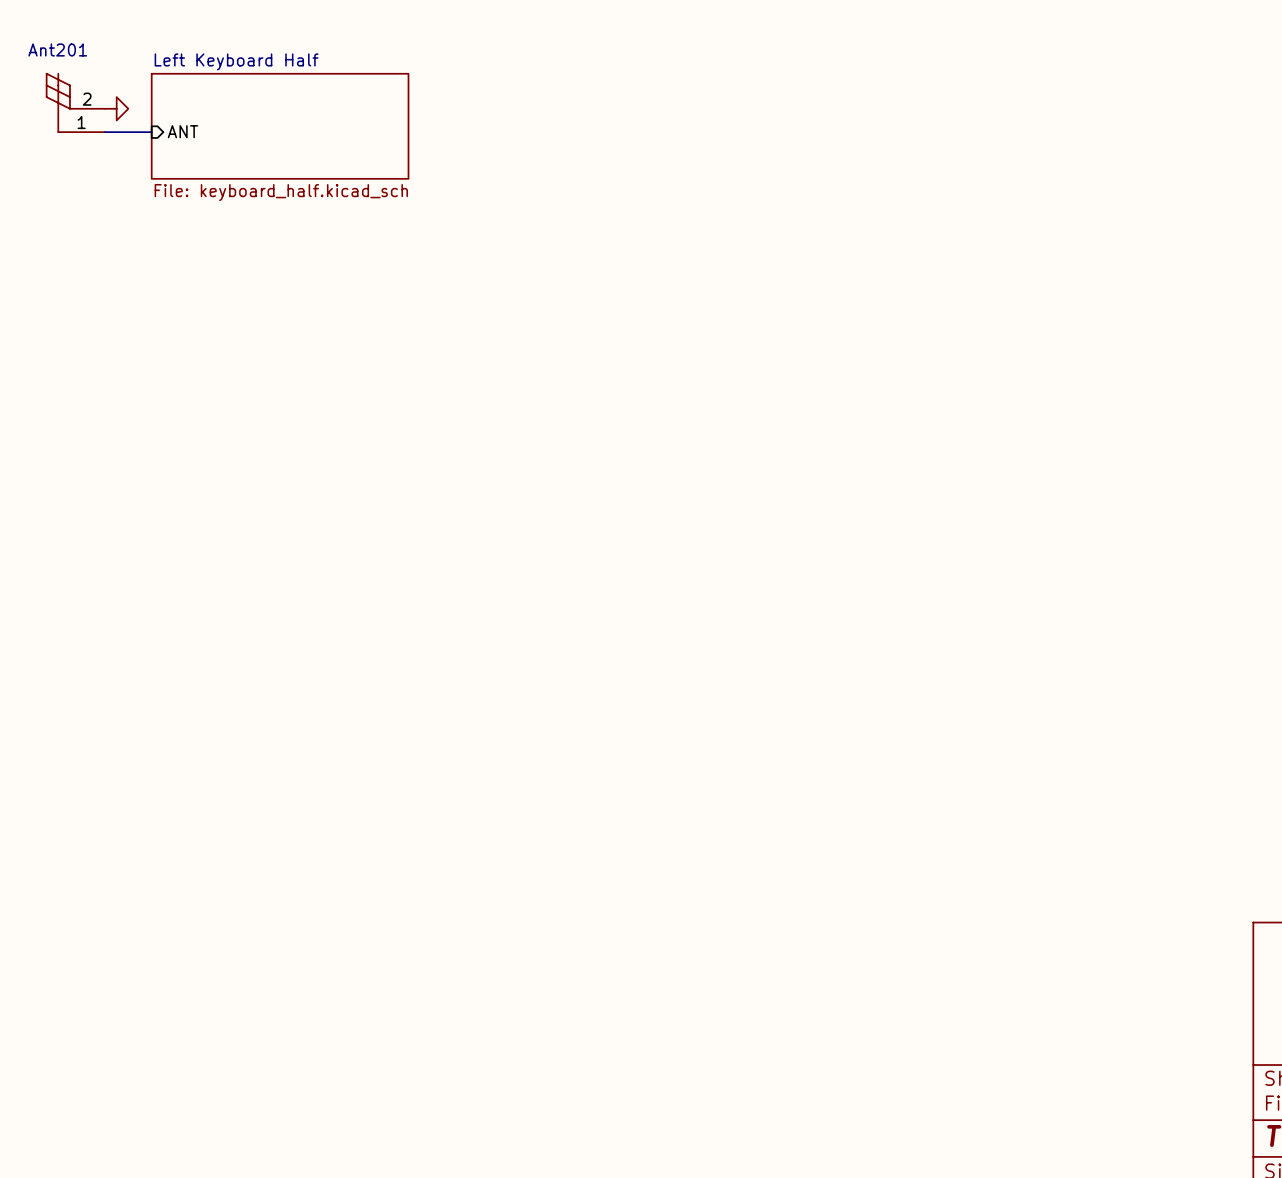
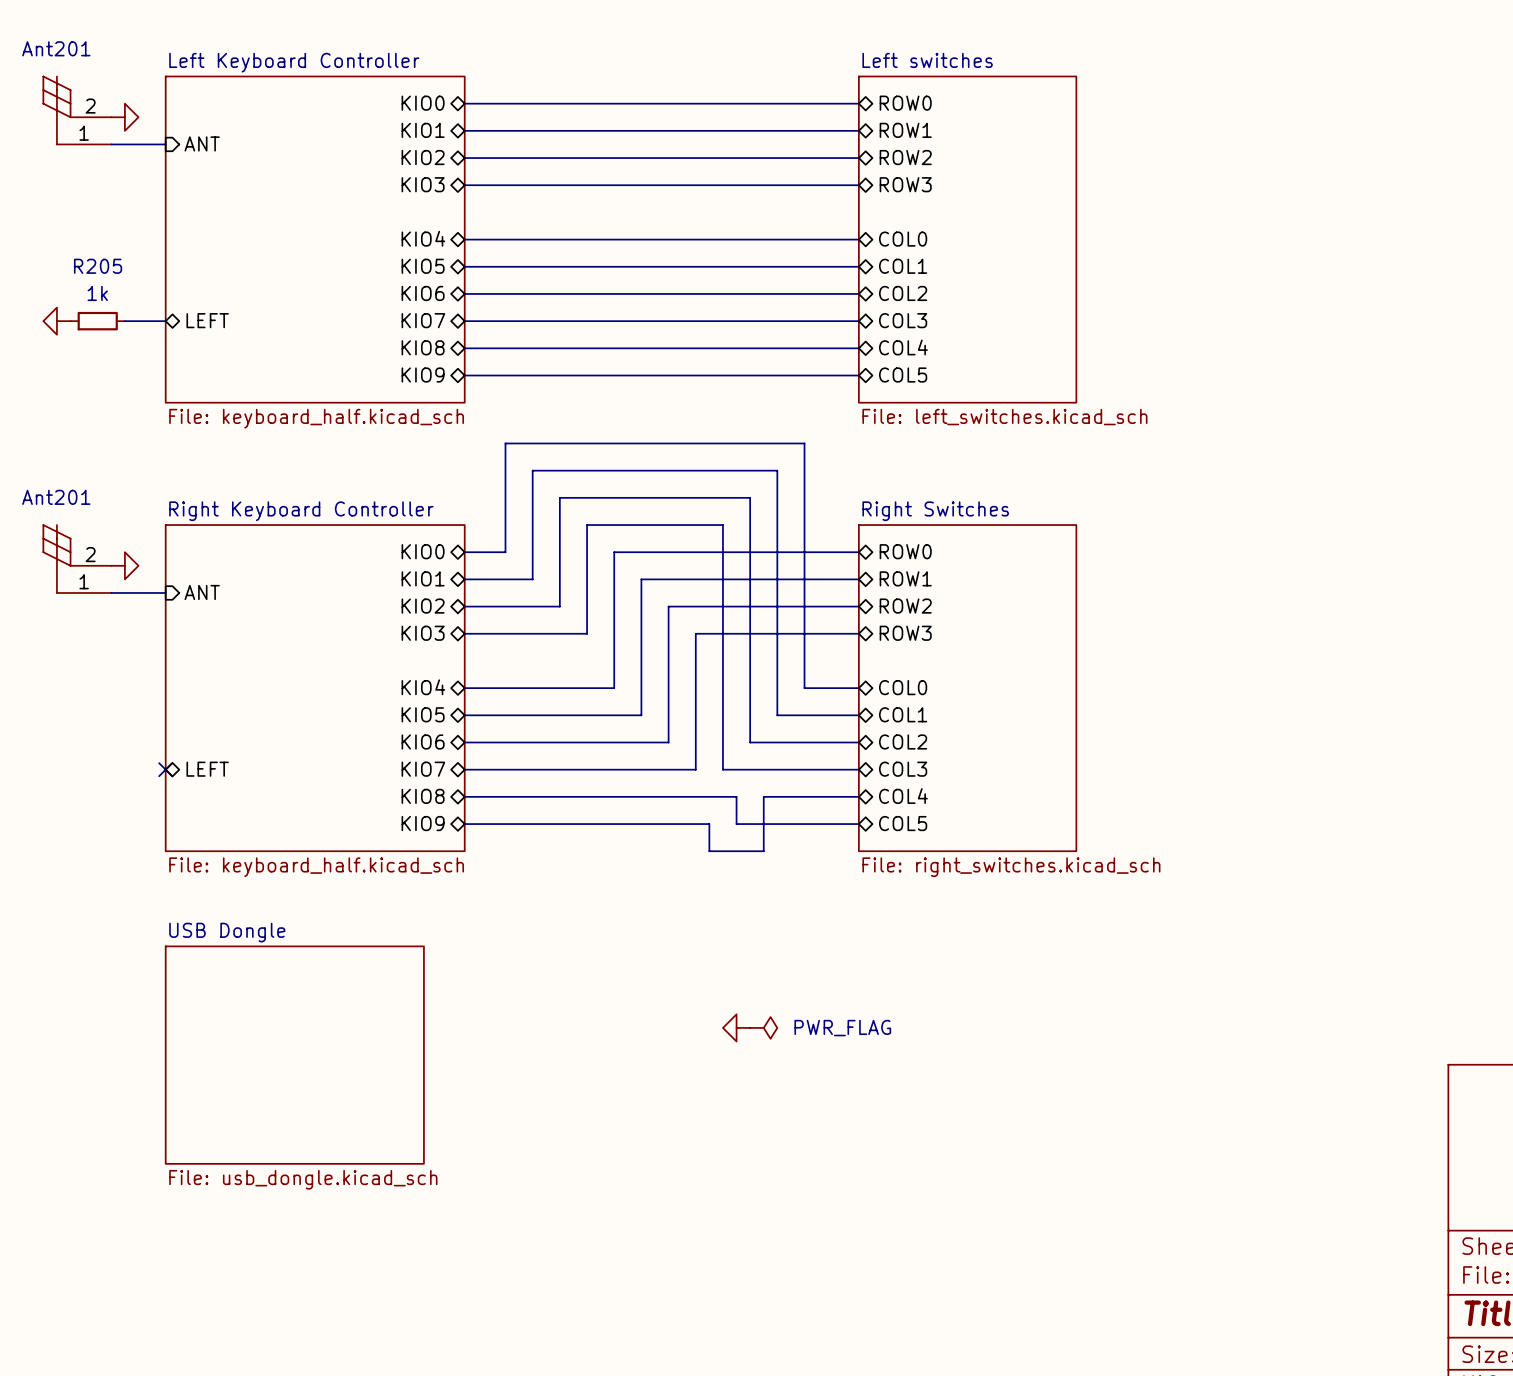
sheet pin: none -> KIO0 (423, 103)
sheet pin: none -> ROW0 (905, 103)
wire: none -> (464, 103) (858, 103)
sheet pin: none -> KIO1 (423, 130)
wire: none -> (464, 130) (858, 130)
sheet pin: none -> ROW1 (905, 130)
sheet Left Keyboard Half: File: keyboard_half.kicad_sch (280, 126) -> none
sheet pin: none -> KIO2 (423, 157)
wire: none -> (464, 158) (858, 158)
sheet pin: none -> ROW2 (905, 157)
sheet pin: none -> KIO3 (423, 184)
sheet pin: none -> ROW3 (905, 184)
wire: none -> (464, 185) (858, 185)
sheet Left Keyboard Controller: none -> File: keyboard_half.kicad_sch (315, 239)
sheet pin: none -> KIO4 (423, 238)
wire: none -> (464, 239) (858, 239)
sheet pin: none -> COL0 (903, 239)
sheet Left switches: none -> File: left_switches.kicad_sch (967, 239)
sheet pin: none -> KIO5 (423, 266)
sheet pin: none -> COL1 (903, 266)
wire: none -> (464, 266) (858, 266)
sheet pin: none -> KIO6 (423, 293)
wire: none -> (464, 293) (858, 293)
sheet pin: none -> COL2 (903, 293)
power symbol: none -> (56, 321)
R205: none -> 1k (97, 321)
wire: none -> (124, 321) (165, 321)
sheet pin: none -> LEFT (207, 320)
sheet pin: none -> KIO7 (423, 320)
wire: none -> (464, 321) (858, 321)
sheet pin: none -> COL3 (903, 320)
sheet pin: none -> KIO8 (423, 347)
sheet pin: none -> COL4 (903, 347)
wire: none -> (464, 348) (858, 348)
sheet pin: none -> KIO9 (423, 375)
wire: none -> (464, 375) (858, 375)
sheet pin: none -> COL5 (903, 375)
sheet pin: none -> KIO0 (423, 551)
sheet pin: none -> ROW0 (905, 551)
wire: none -> (464, 552) (505, 552) (505, 443) (804, 443) (804, 688) (858, 688)
wire: none -> (858, 552) (614, 552) (614, 688) (464, 688)
Ant201: none -> (77, 559)
power symbol: none -> (124, 565)
sheet pin: none -> KIO1 (423, 578)
wire: none -> (464, 579) (532, 579) (532, 470) (777, 470) (777, 715) (858, 715)
wire: none -> (858, 579) (641, 579) (641, 715) (464, 715)
sheet pin: none -> ROW1 (905, 578)
sheet pin: none -> ANT (202, 592)
wire: none -> (111, 592) (165, 592)
sheet pin: none -> KIO2 (423, 606)
sheet pin: none -> ROW2 (905, 606)
wire: none -> (464, 606) (559, 606) (559, 497) (750, 497) (750, 742) (858, 742)
wire: none -> (858, 606) (668, 606) (668, 742) (464, 742)
sheet pin: none -> KIO3 (423, 633)
sheet pin: none -> ROW3 (905, 633)
wire: none -> (464, 633) (587, 633) (587, 525) (722, 525) (722, 769) (858, 769)
wire: none -> (858, 633) (695, 633) (695, 769) (464, 769)
sheet pin: none -> KIO4 (423, 687)
sheet pin: none -> COL0 (903, 687)
sheet Right Keyboard Controller: none -> File: keyboard_half.kicad_sch (315, 688)
sheet Right Switches: none -> File: right_switches.kicad_sch (967, 688)
sheet pin: none -> KIO5 (423, 714)
sheet pin: none -> COL1 (903, 714)
sheet pin: none -> KIO6 (423, 741)
sheet pin: none -> COL2 (903, 741)
sheet pin: none -> LEFT (207, 769)
sheet pin: none -> KIO7 (423, 769)
sheet pin: none -> COL3 (903, 769)
no-connect mark: none -> (165, 769)
sheet pin: none -> COL4 (903, 796)
sheet pin: none -> KIO8 (423, 796)
wire: none -> (464, 796) (736, 796) (736, 824) (858, 824)
wire: none -> (858, 796) (763, 796) (763, 851) (709, 851) (709, 824) (464, 824)
sheet pin: none -> KIO9 (423, 823)
sheet pin: none -> COL5 (903, 823)
power symbol: none -> (736, 1027)
power symbol: none -> PWR_FLAG (763, 1027)
sheet USB Dongle: none -> File: usb_dongle.kicad_sch (294, 1055)

